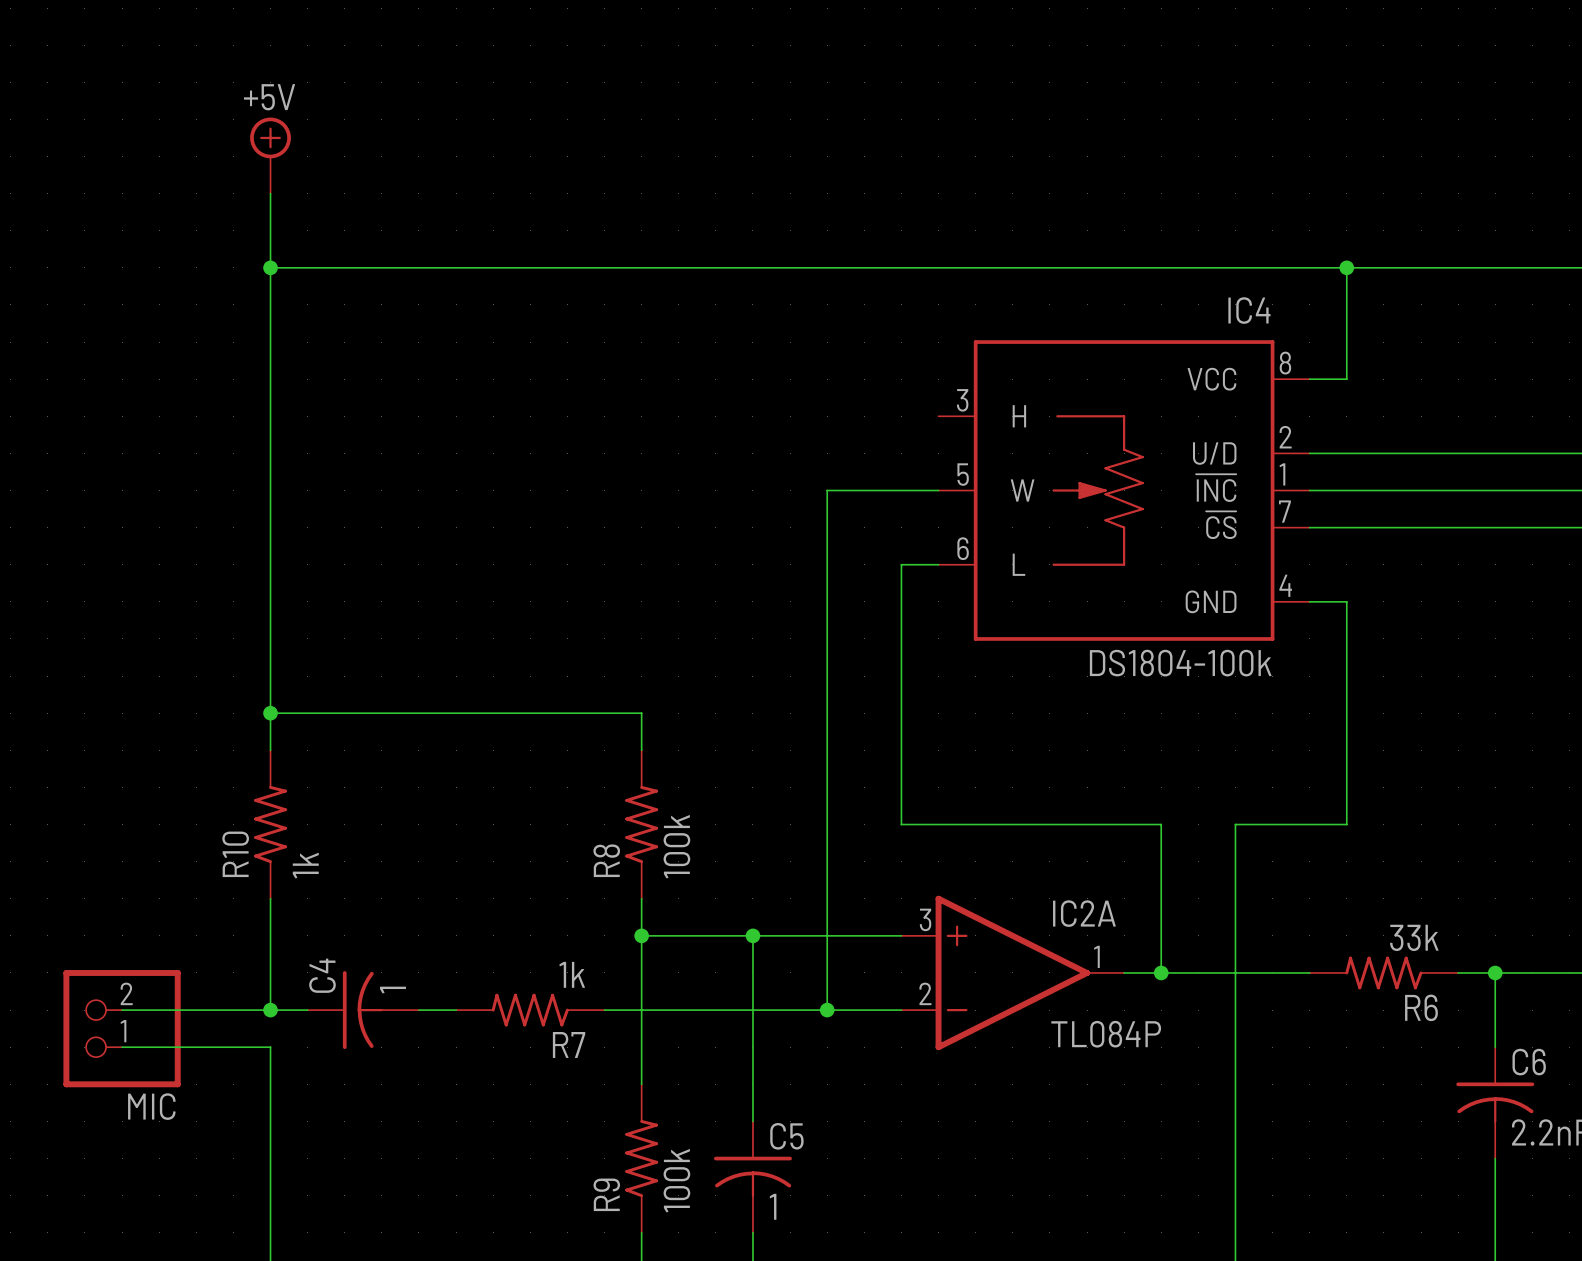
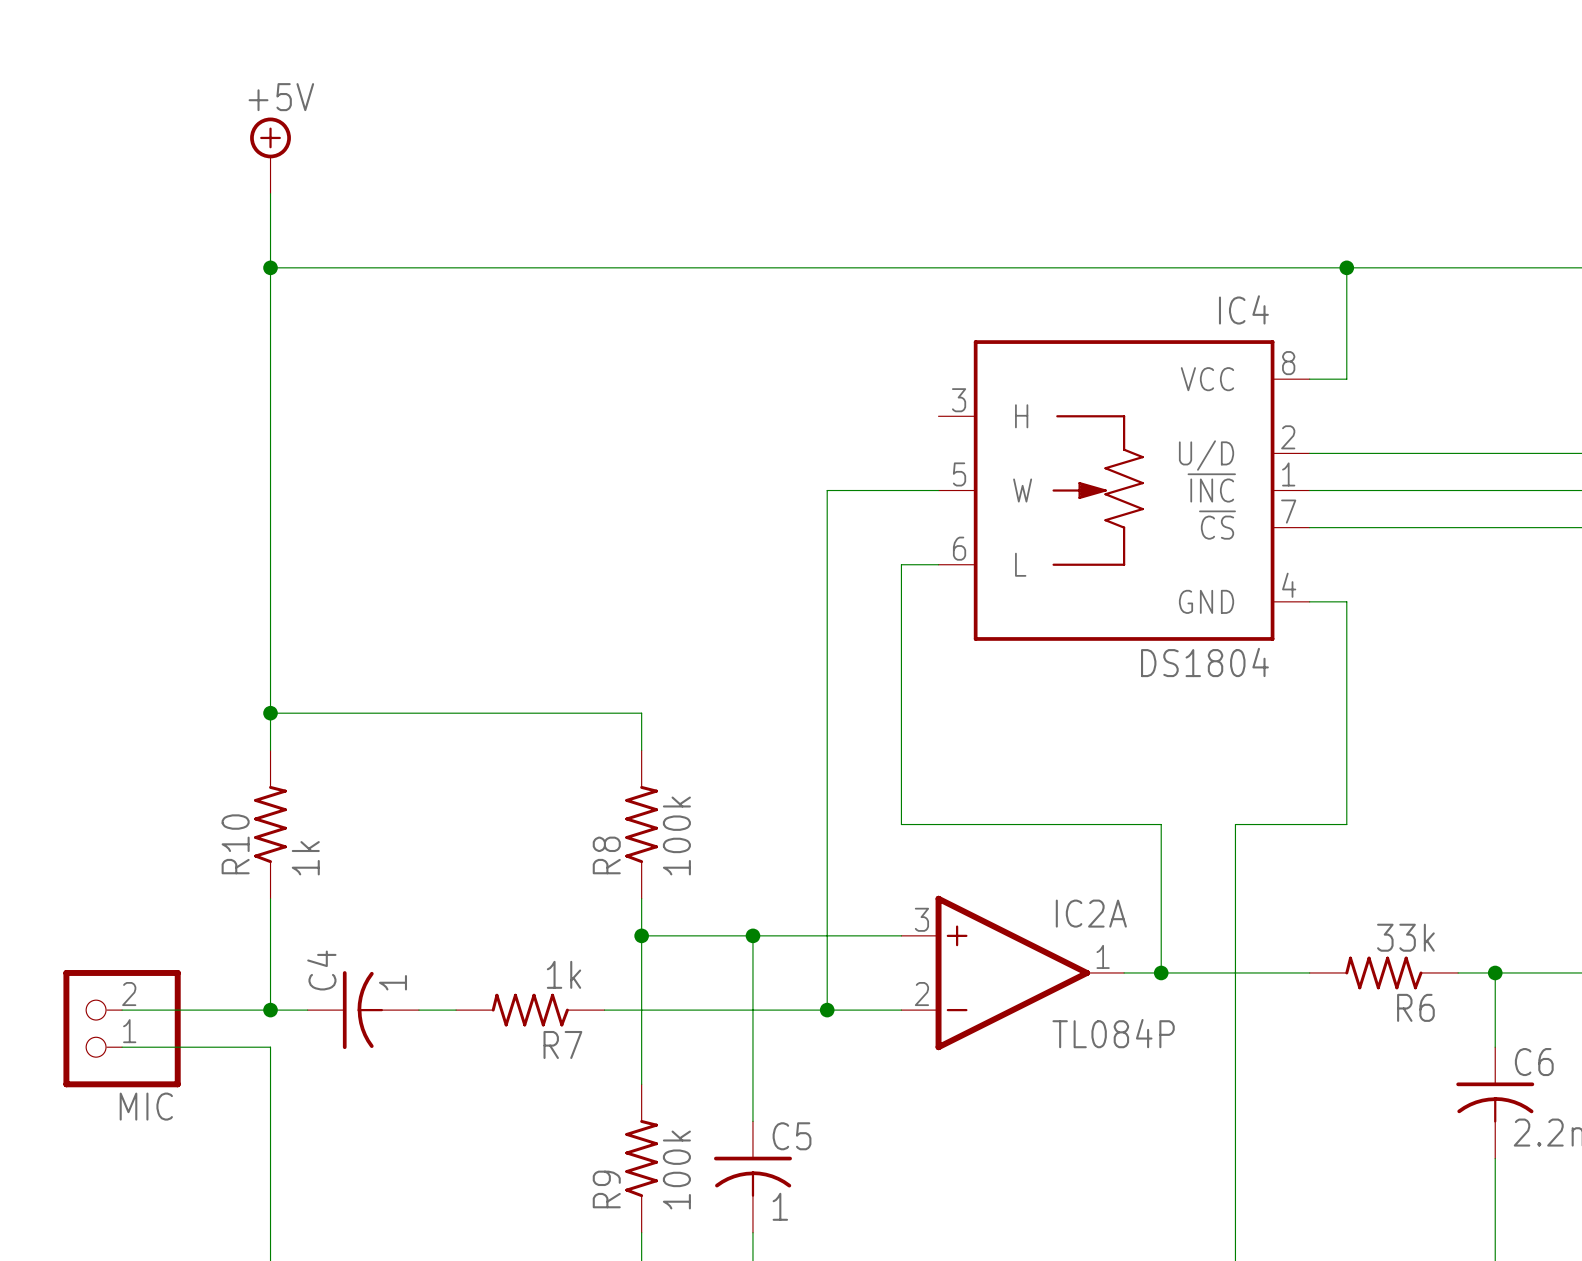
IC4 value: DS1804-100k (1180, 663) -> DS1804 (1204, 662)

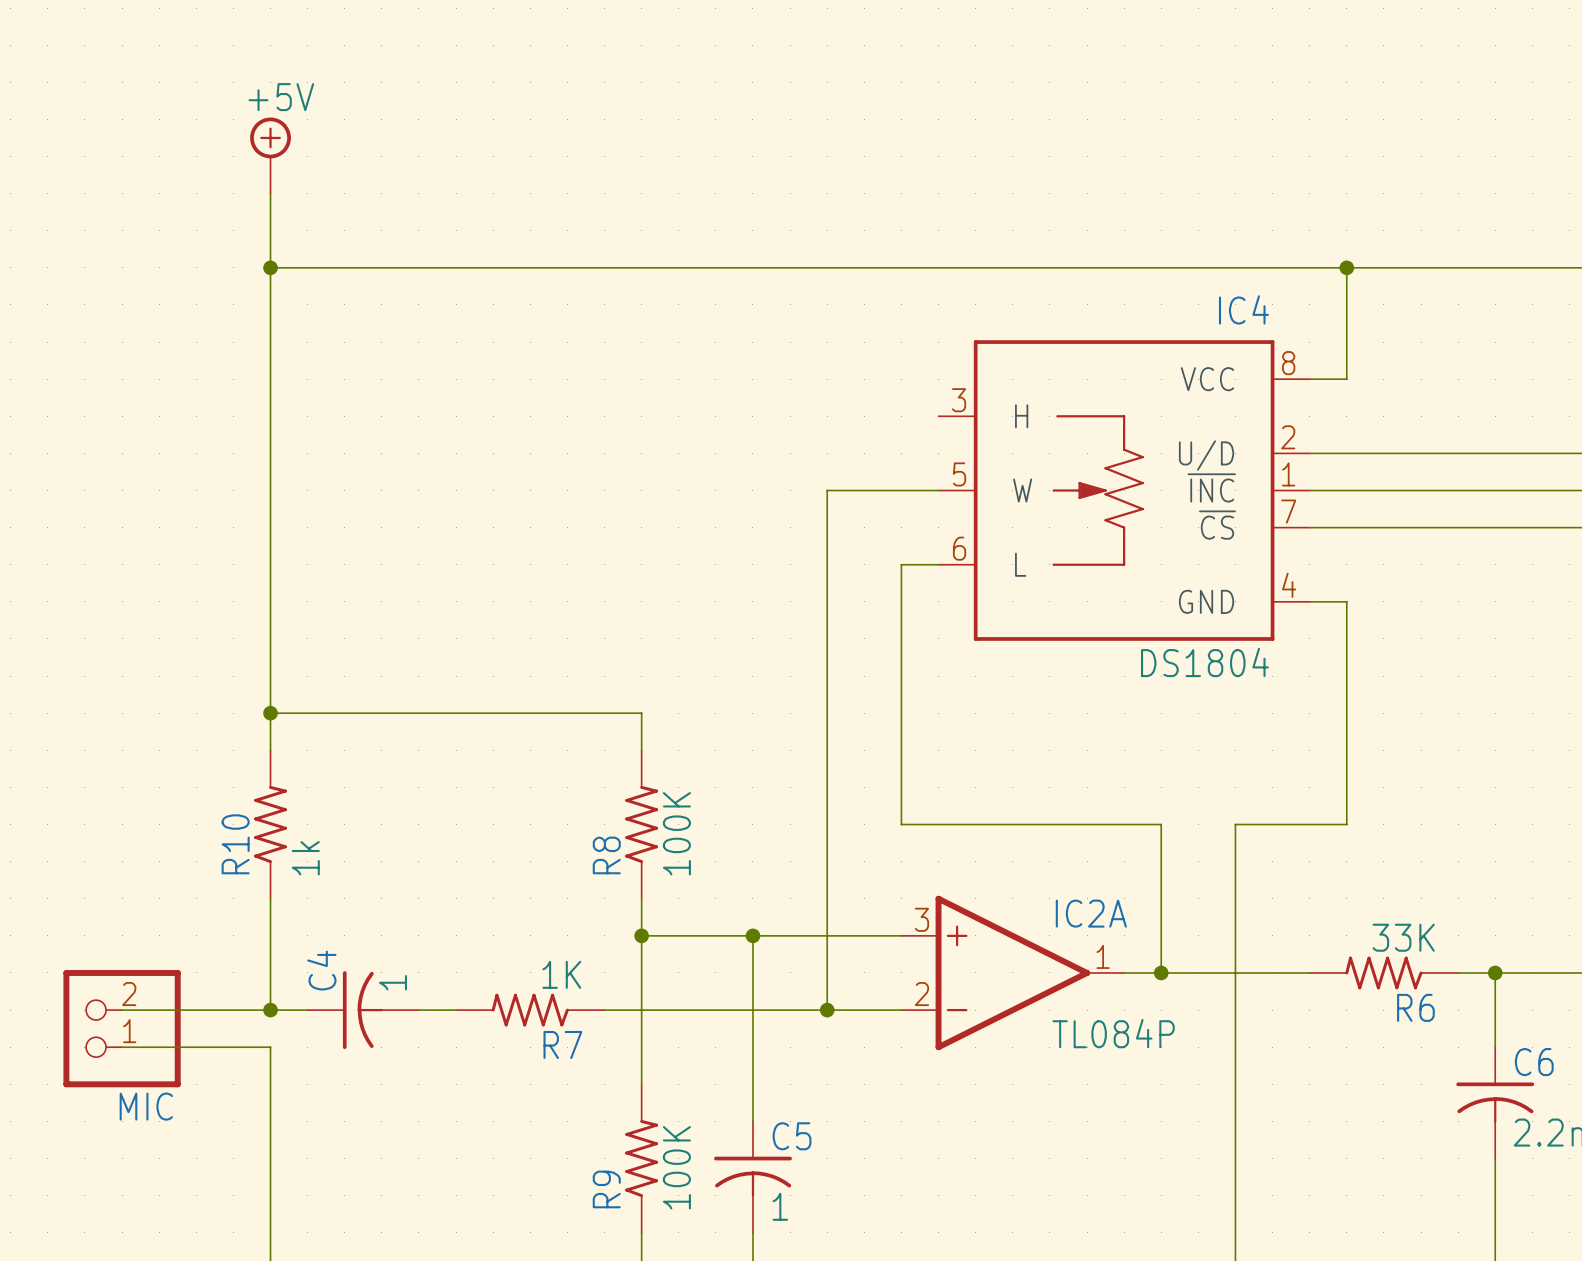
R8 value: 100k (676, 835) -> 100K (676, 833)
R6 value: 33k (1405, 937) -> 33K (1403, 937)
R7 value: 1k (564, 974) -> 1K (561, 974)
R9 value: 100k (676, 1169) -> 100K (676, 1167)

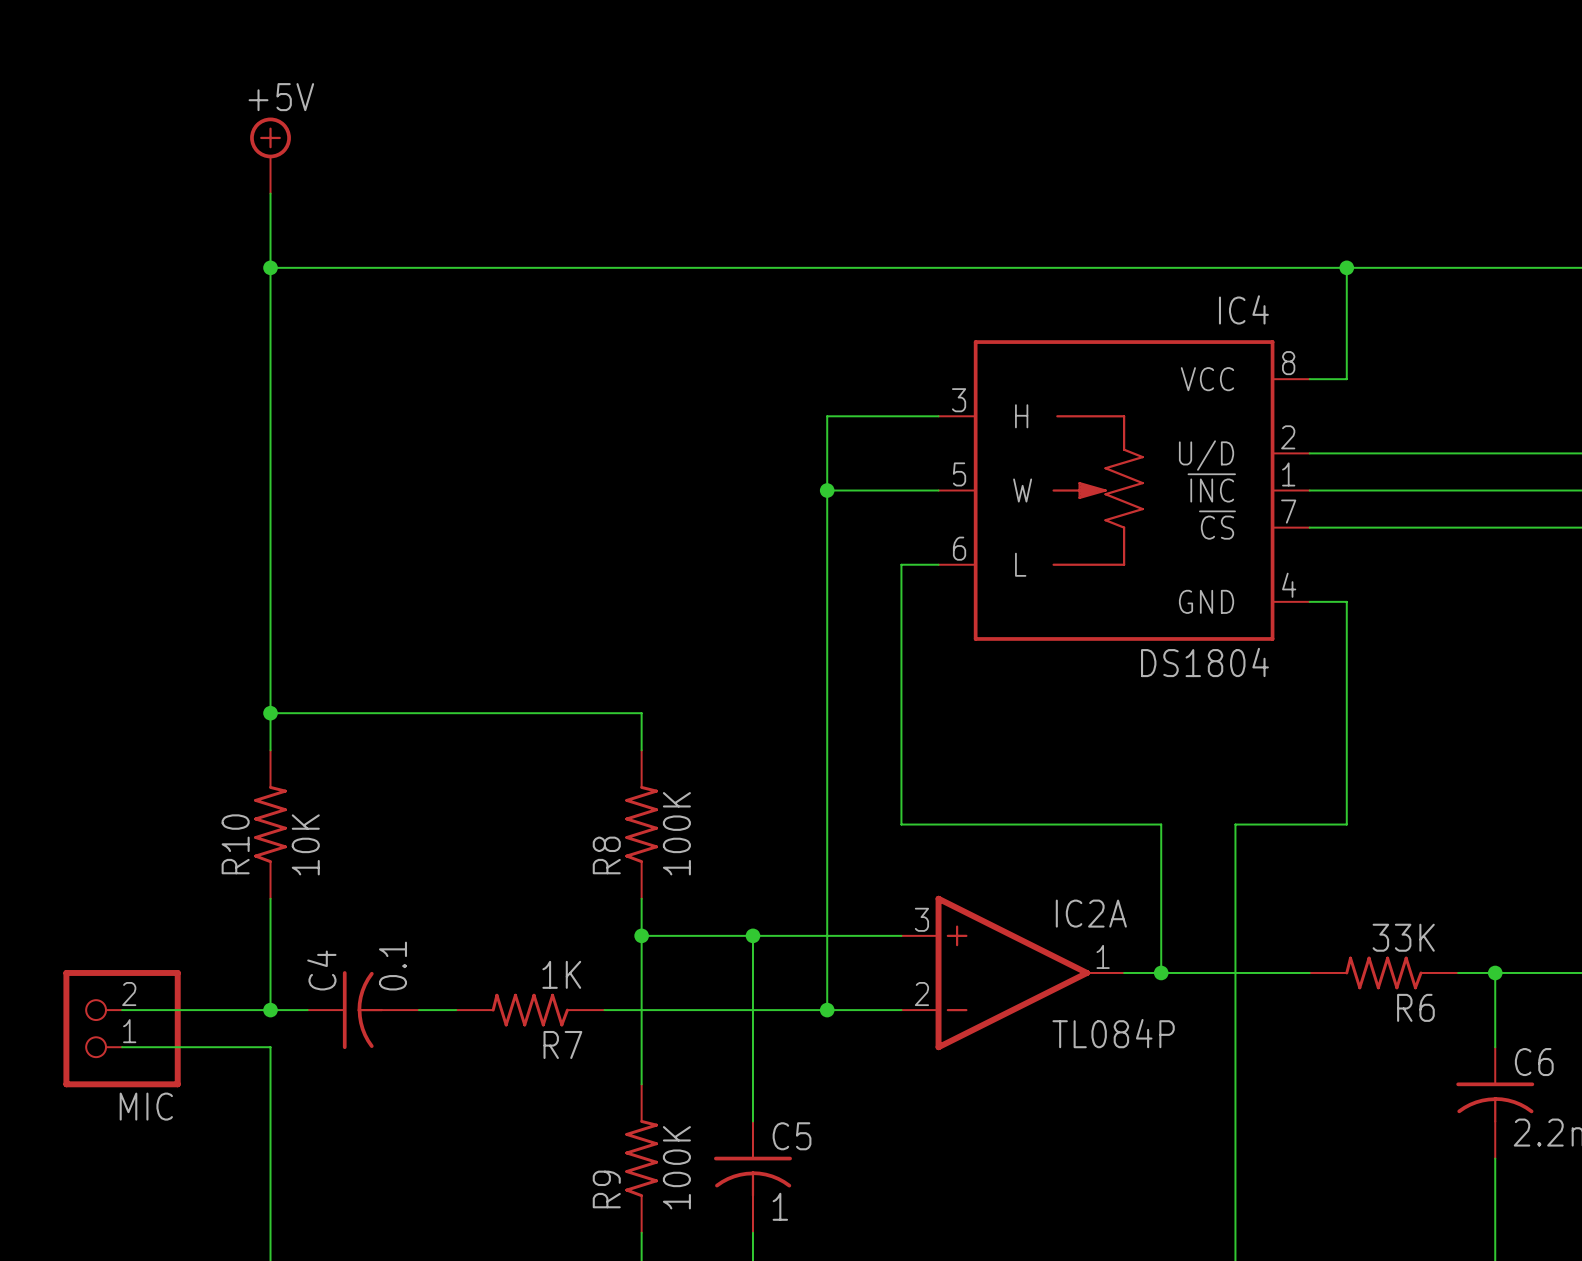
wire: none -> (938, 416) (827, 416) (827, 490)
junction: none -> (827, 490)
R10 value: 1k (305, 858) -> 10K (305, 844)
C4 value: 1 (392, 982) -> 0.1 (392, 966)

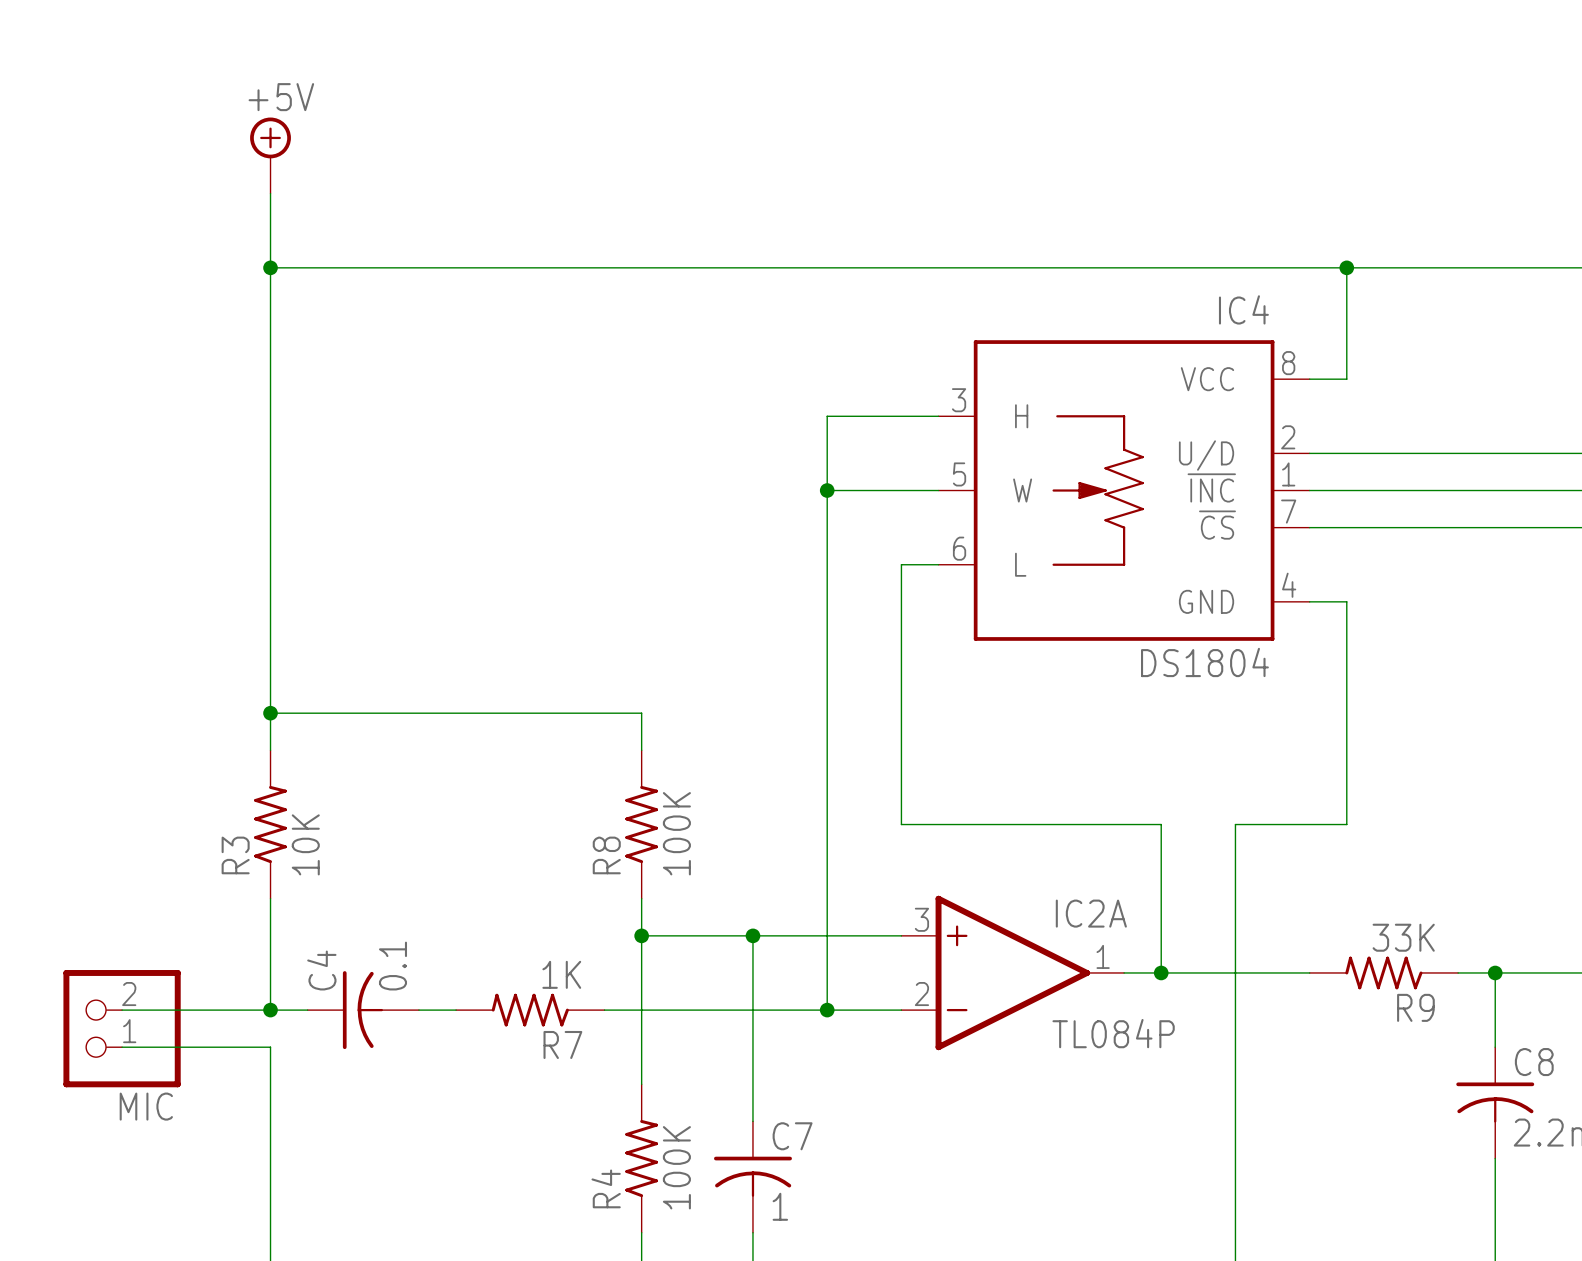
R10 name: R10 (235, 844) -> R3 (235, 855)
R6 name: R6 (1415, 1007) -> R9 (1415, 1007)
C6 name: C6 (1534, 1062) -> C8 (1534, 1062)
C5 name: C5 (792, 1136) -> C7 (792, 1136)
R9 name: R9 (606, 1189) -> R4 (606, 1188)

